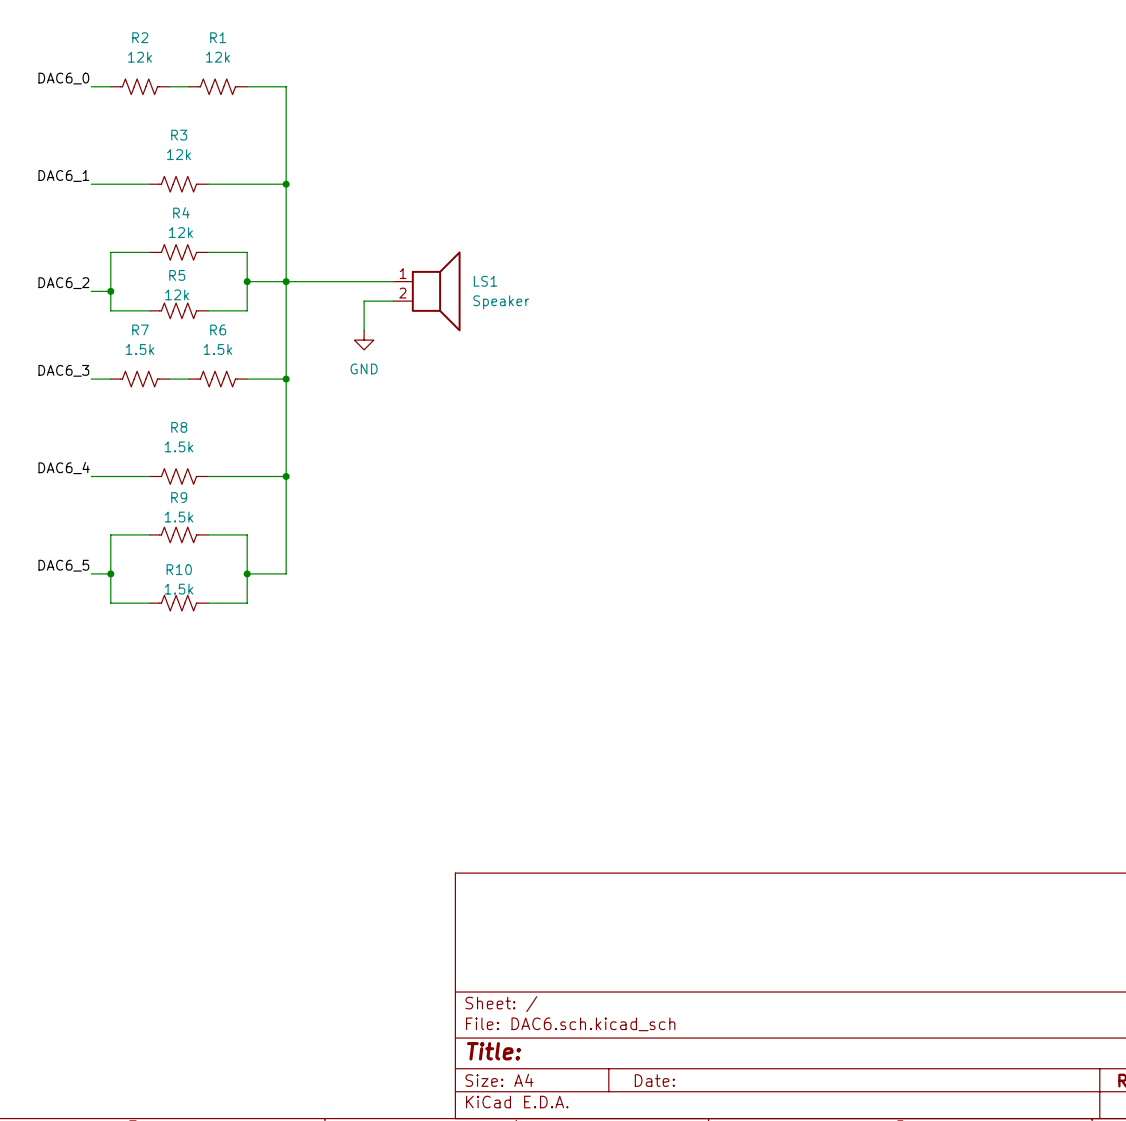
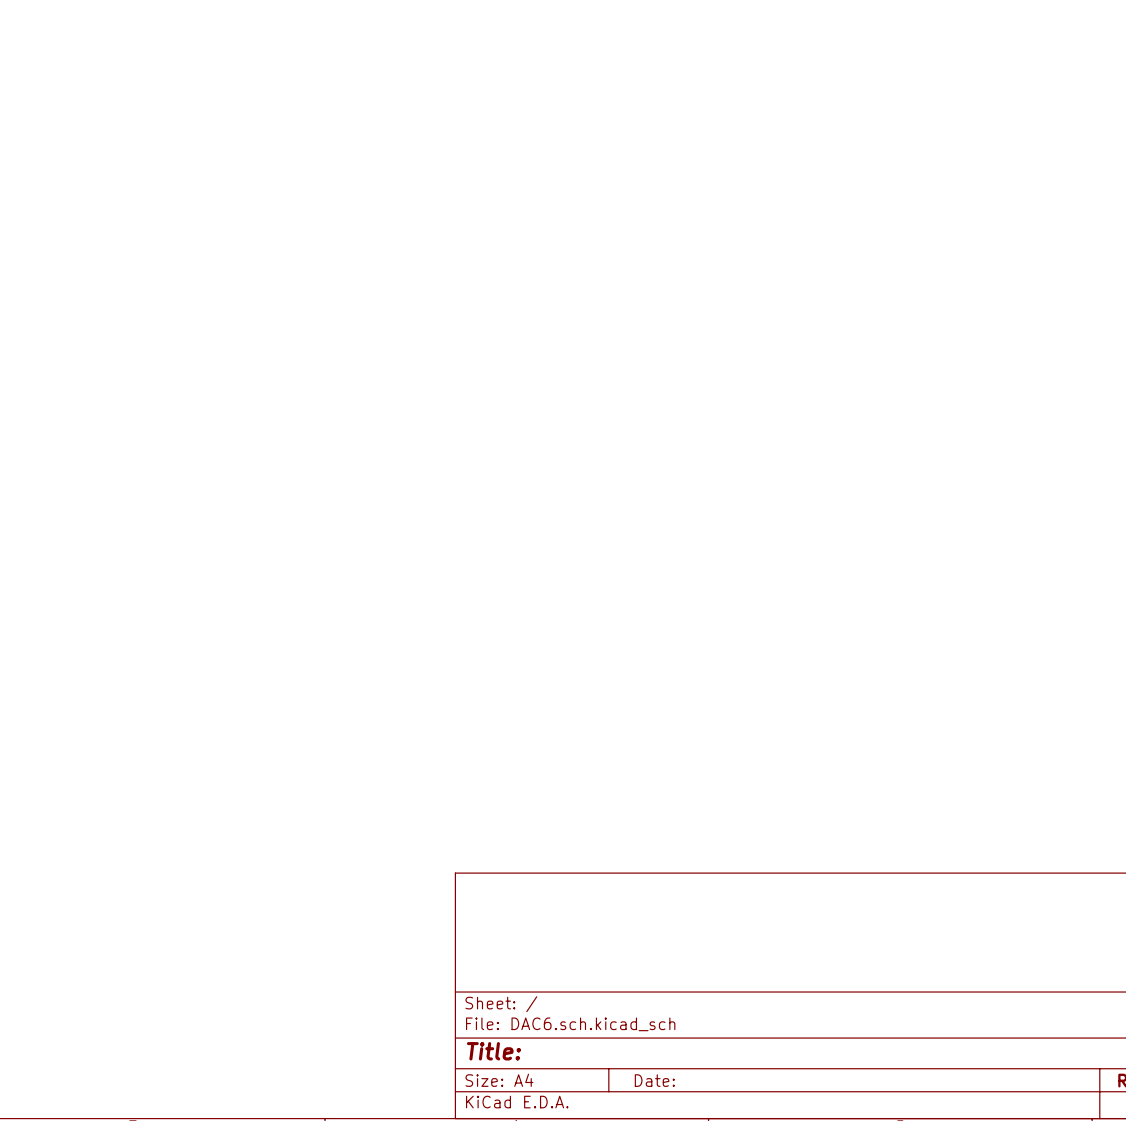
label: DAC6_0 (63, 78) -> none
wire: (91, 86) (110, 86) -> none
R2: 12k (140, 86) -> none
wire: (169, 86) (188, 86) -> none
R1: 12k (217, 86) -> none
wire: (247, 86) (286, 86) (286, 573) (247, 573) -> none
label: DAC6_1 (63, 175) -> none
wire: (91, 184) (149, 184) -> none
R3: 12k (178, 184) -> none
wire: (208, 184) (286, 184) -> none
junction: (286, 184) -> none
wire: (149, 252) (110, 252) (110, 310) (149, 310) -> none
R4: 12k (178, 252) -> none
wire: (208, 252) (247, 252) (247, 310) (208, 310) -> none
wire: (247, 281) (393, 281) -> none
junction: (247, 281) -> none
junction: (286, 281) -> none
label: DAC6_2 (63, 283) -> none
wire: (91, 291) (110, 291) -> none
junction: (110, 291) -> none
LS1: Speaker (426, 291) -> none
wire: (393, 301) (364, 301) (364, 330) -> none
R5: 12k (178, 310) -> none
power symbol: GND (364, 340) -> none
label: DAC6_3 (63, 370) -> none
wire: (91, 379) (110, 379) -> none
R7: 1.5k (140, 379) -> none
wire: (169, 379) (188, 379) -> none
R6: 1.5k (217, 379) -> none
wire: (247, 379) (286, 379) -> none
junction: (286, 379) -> none
label: DAC6_4 (64, 468) -> none
wire: (91, 476) (149, 476) -> none
R8: 1.5k (178, 476) -> none
wire: (208, 476) (286, 476) -> none
junction: (286, 476) -> none
wire: (149, 534) (110, 534) (110, 603) (149, 603) -> none
R9: 1.5k (178, 534) -> none
wire: (208, 534) (247, 534) (247, 603) (208, 603) -> none
label: DAC6_5 (63, 565) -> none
wire: (91, 573) (110, 573) -> none
junction: (110, 573) -> none
junction: (247, 573) -> none
R10: 1.5k (178, 603) -> none

